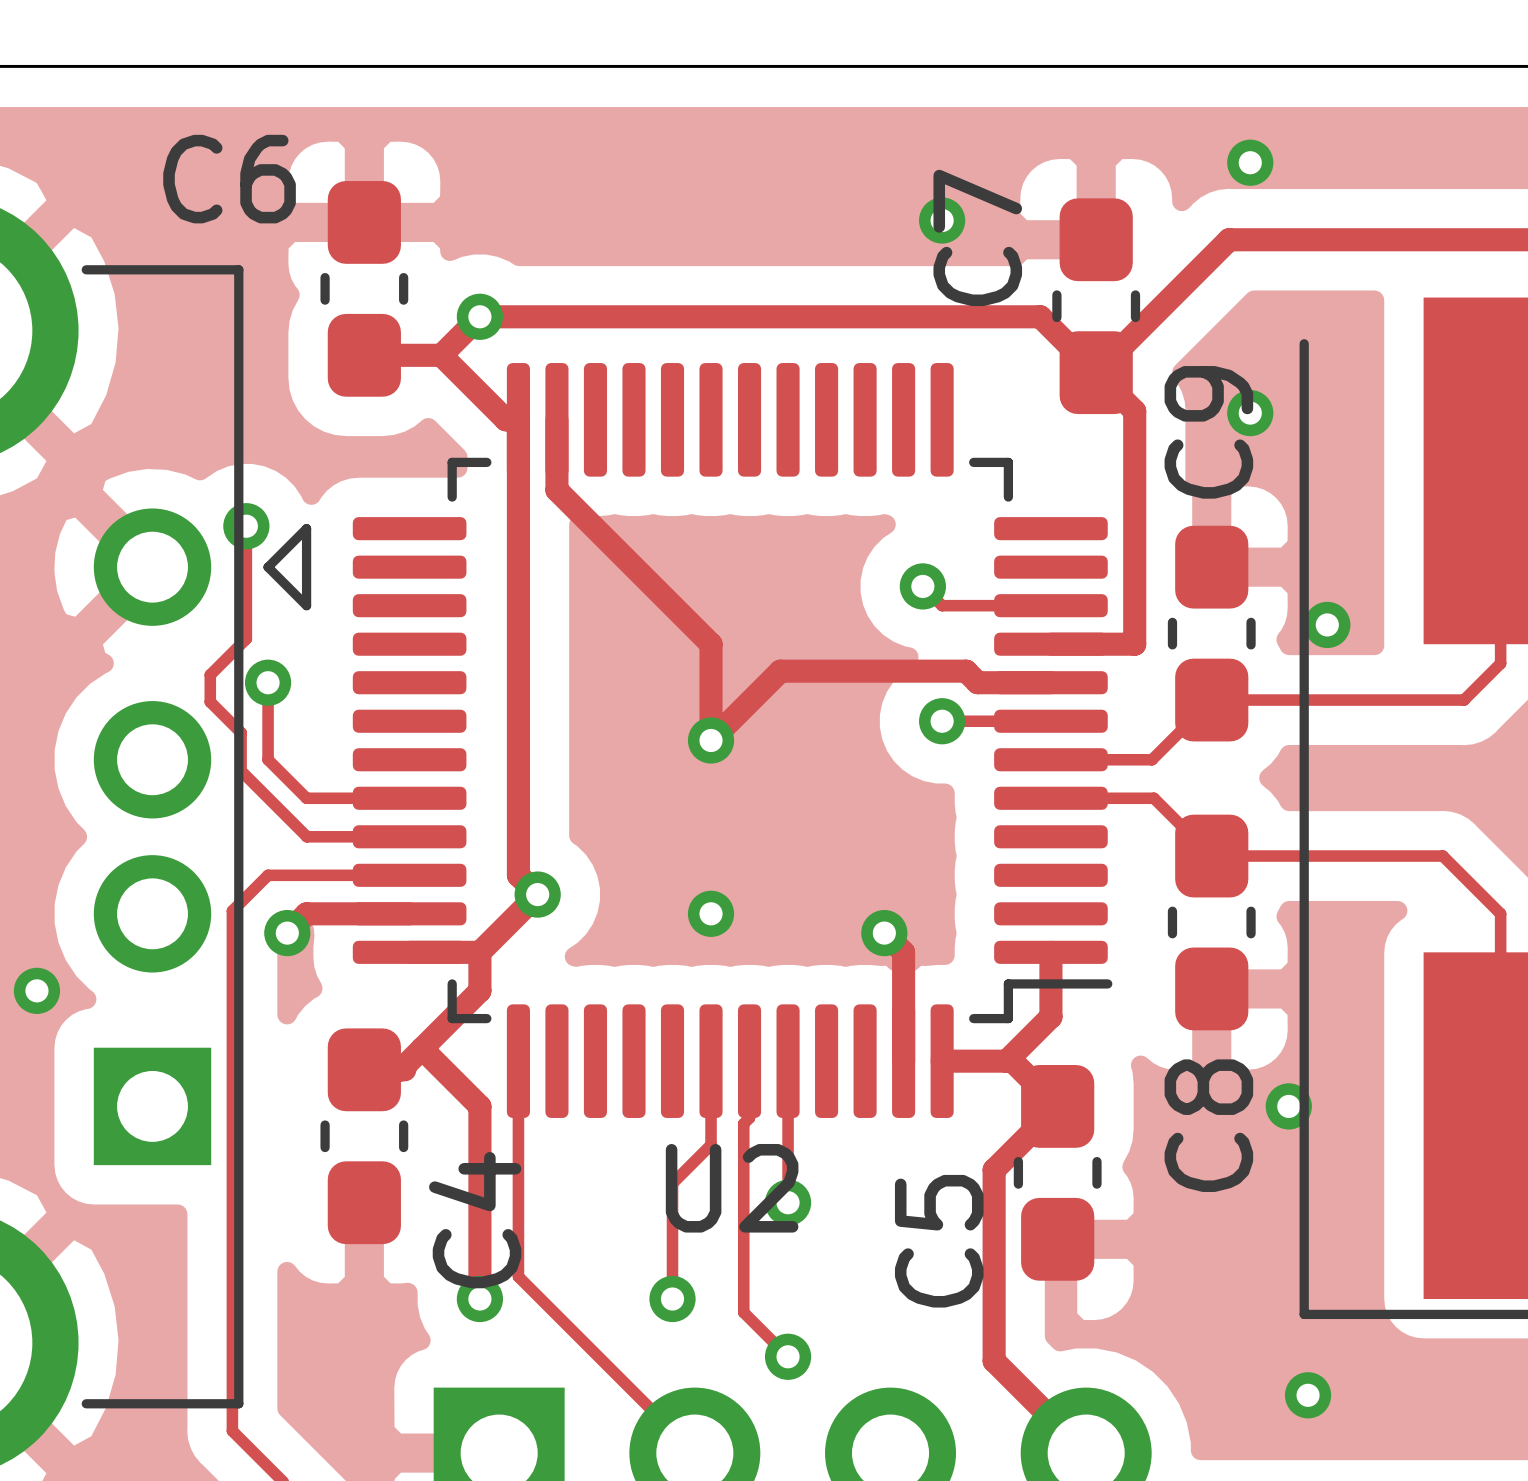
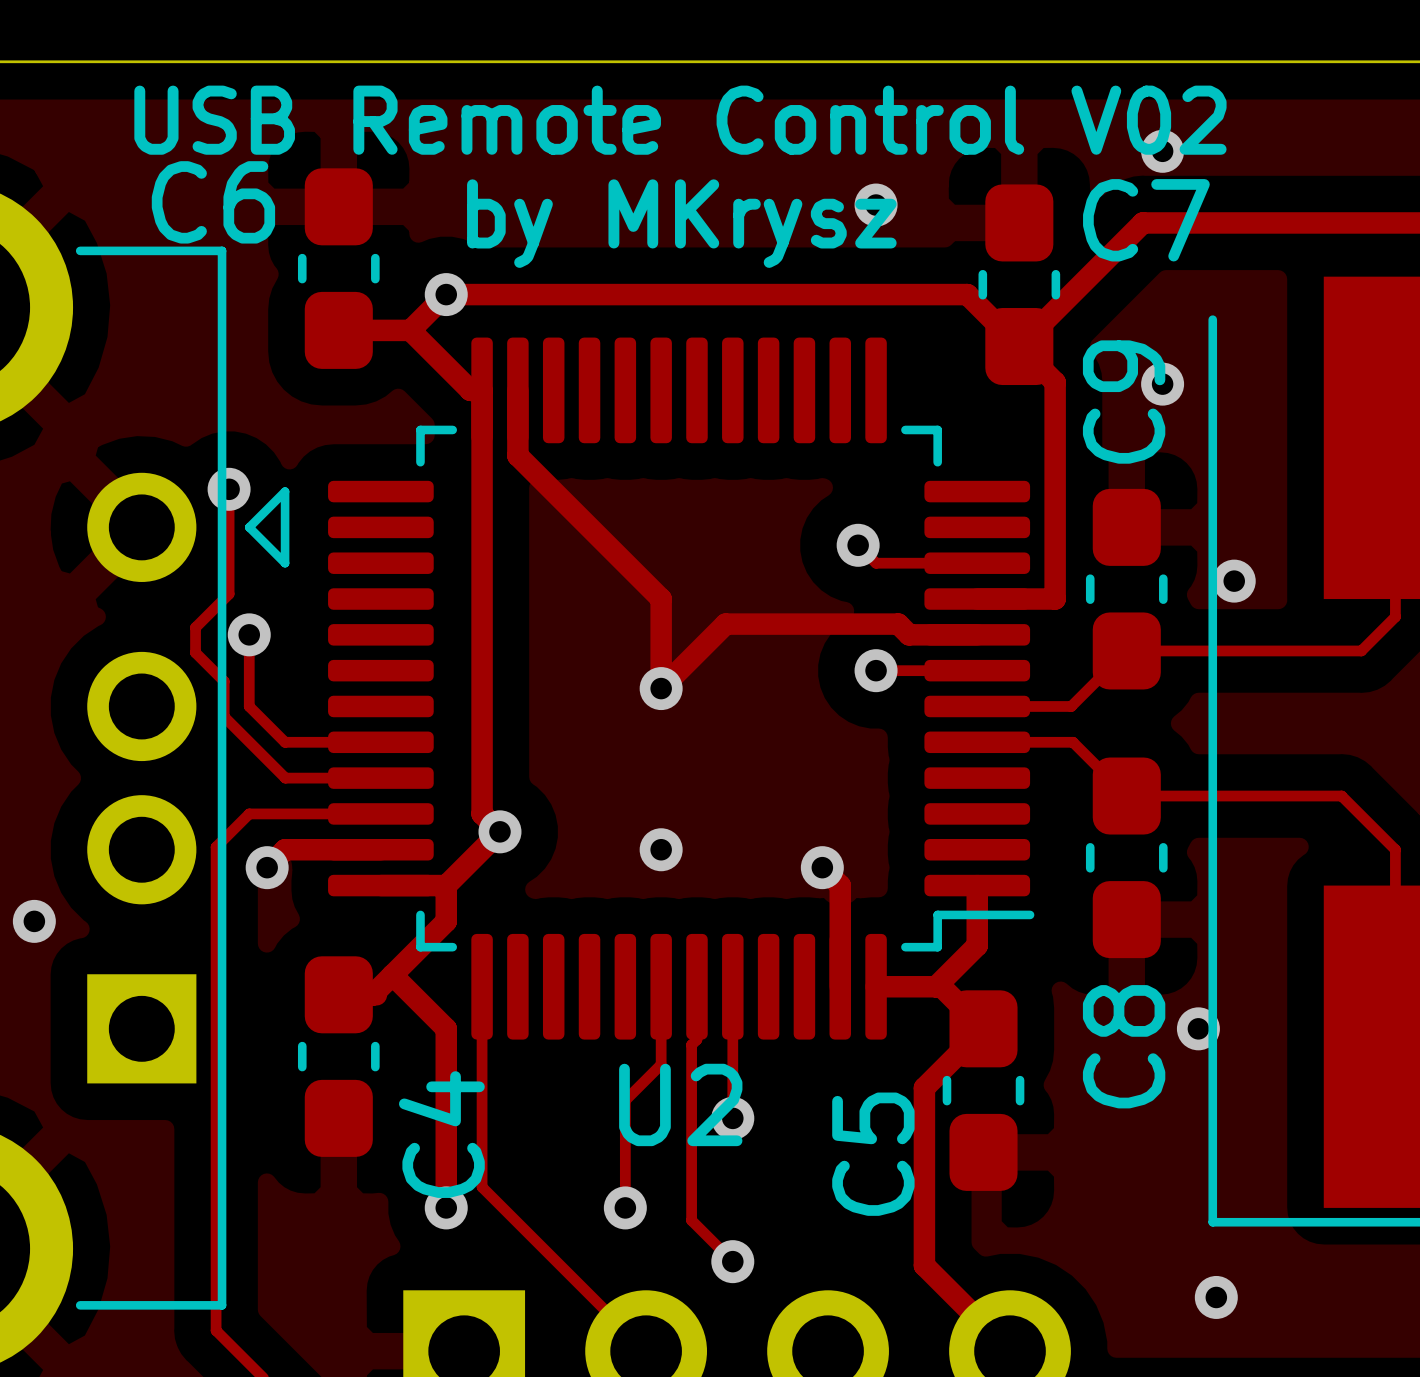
text: none -> USB Remote Control V02 (680, 120)
C6 name position: C6 (229, 179) -> C6 (213, 202)
C7 name rotation: 0° (977, 237) -> 90° clockwise (1146, 220)
C7 name position: C7 (977, 237) -> C7 (1146, 220)
text: none -> by MKrysz (681, 223)

